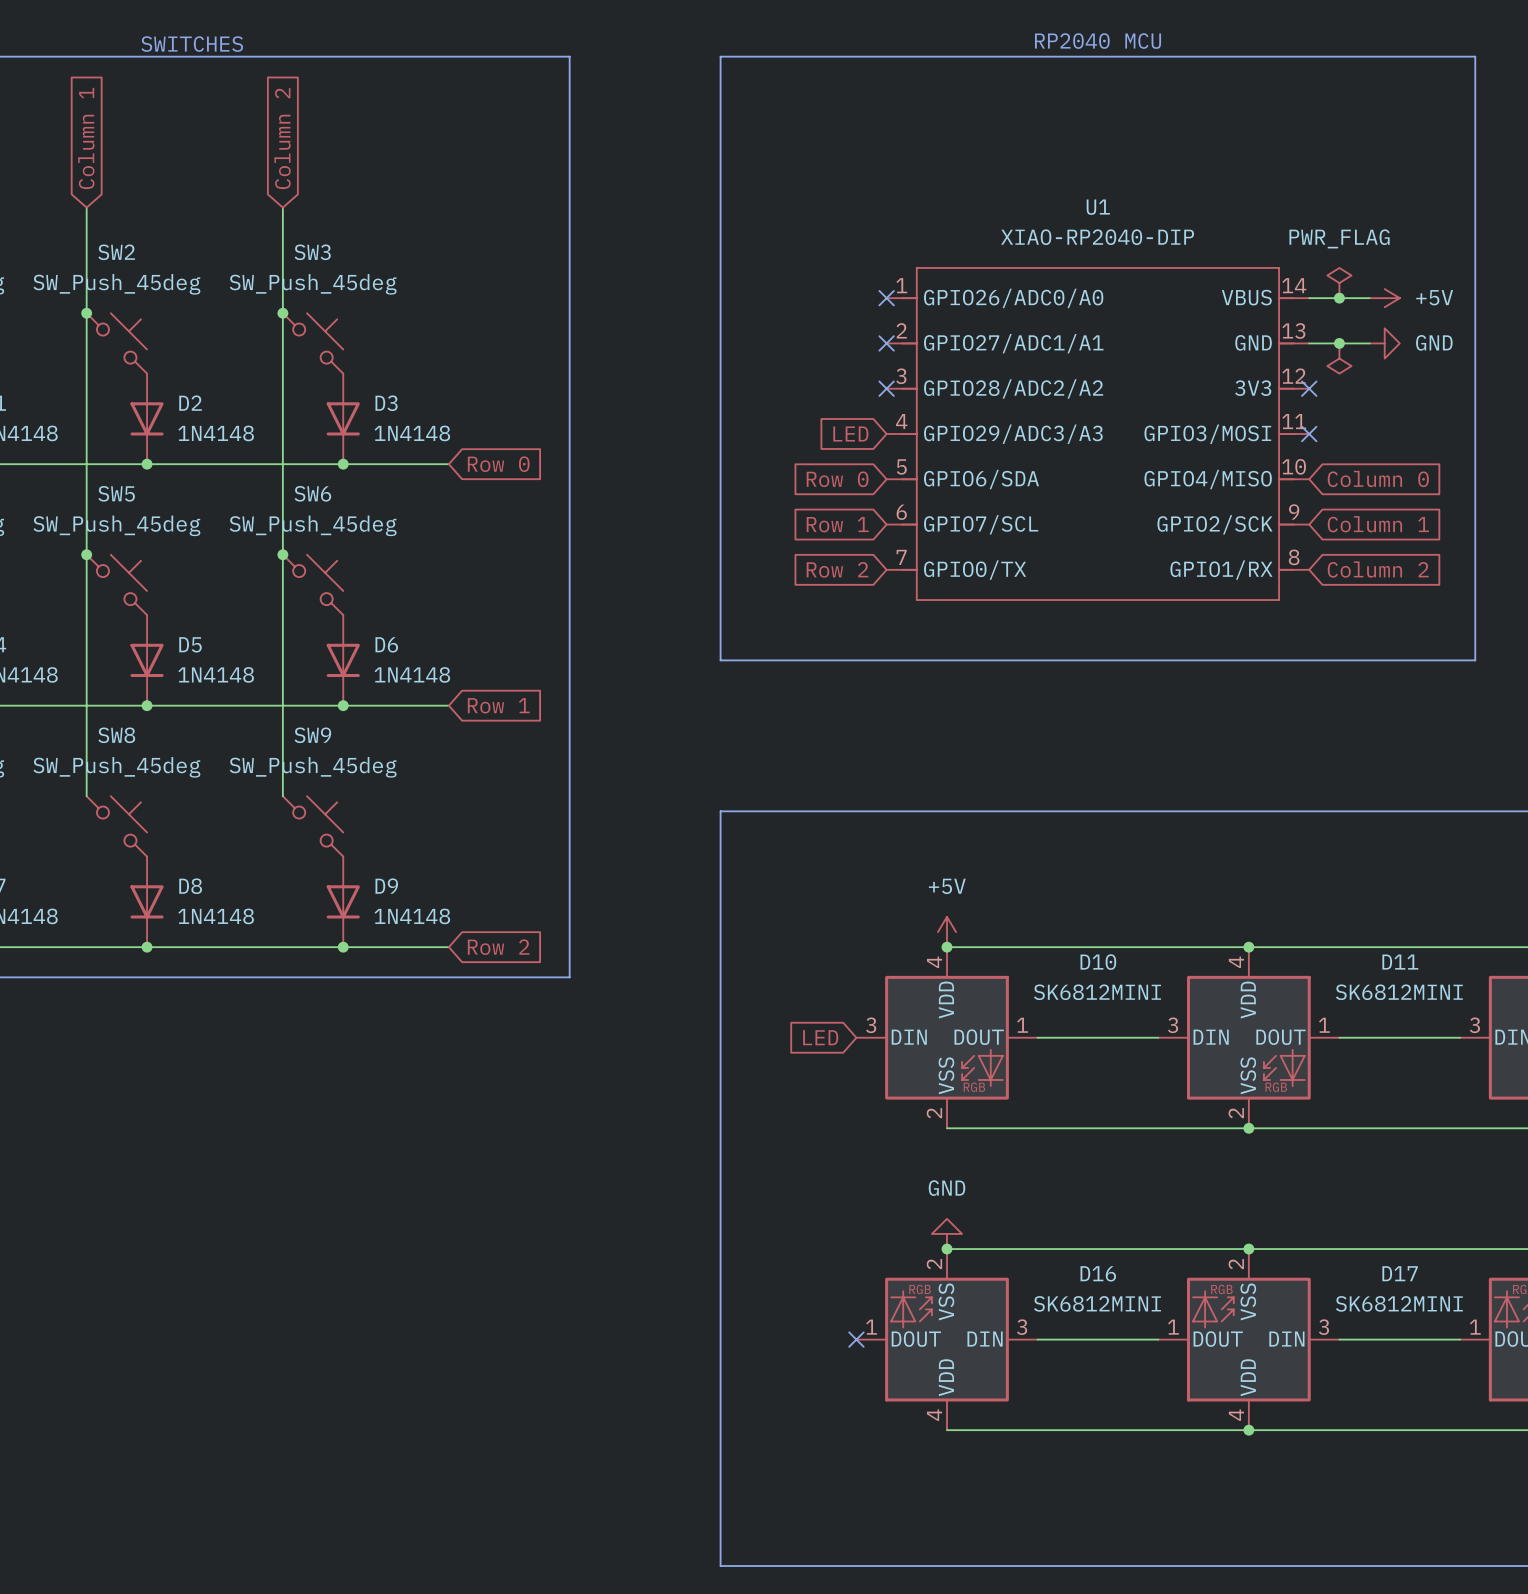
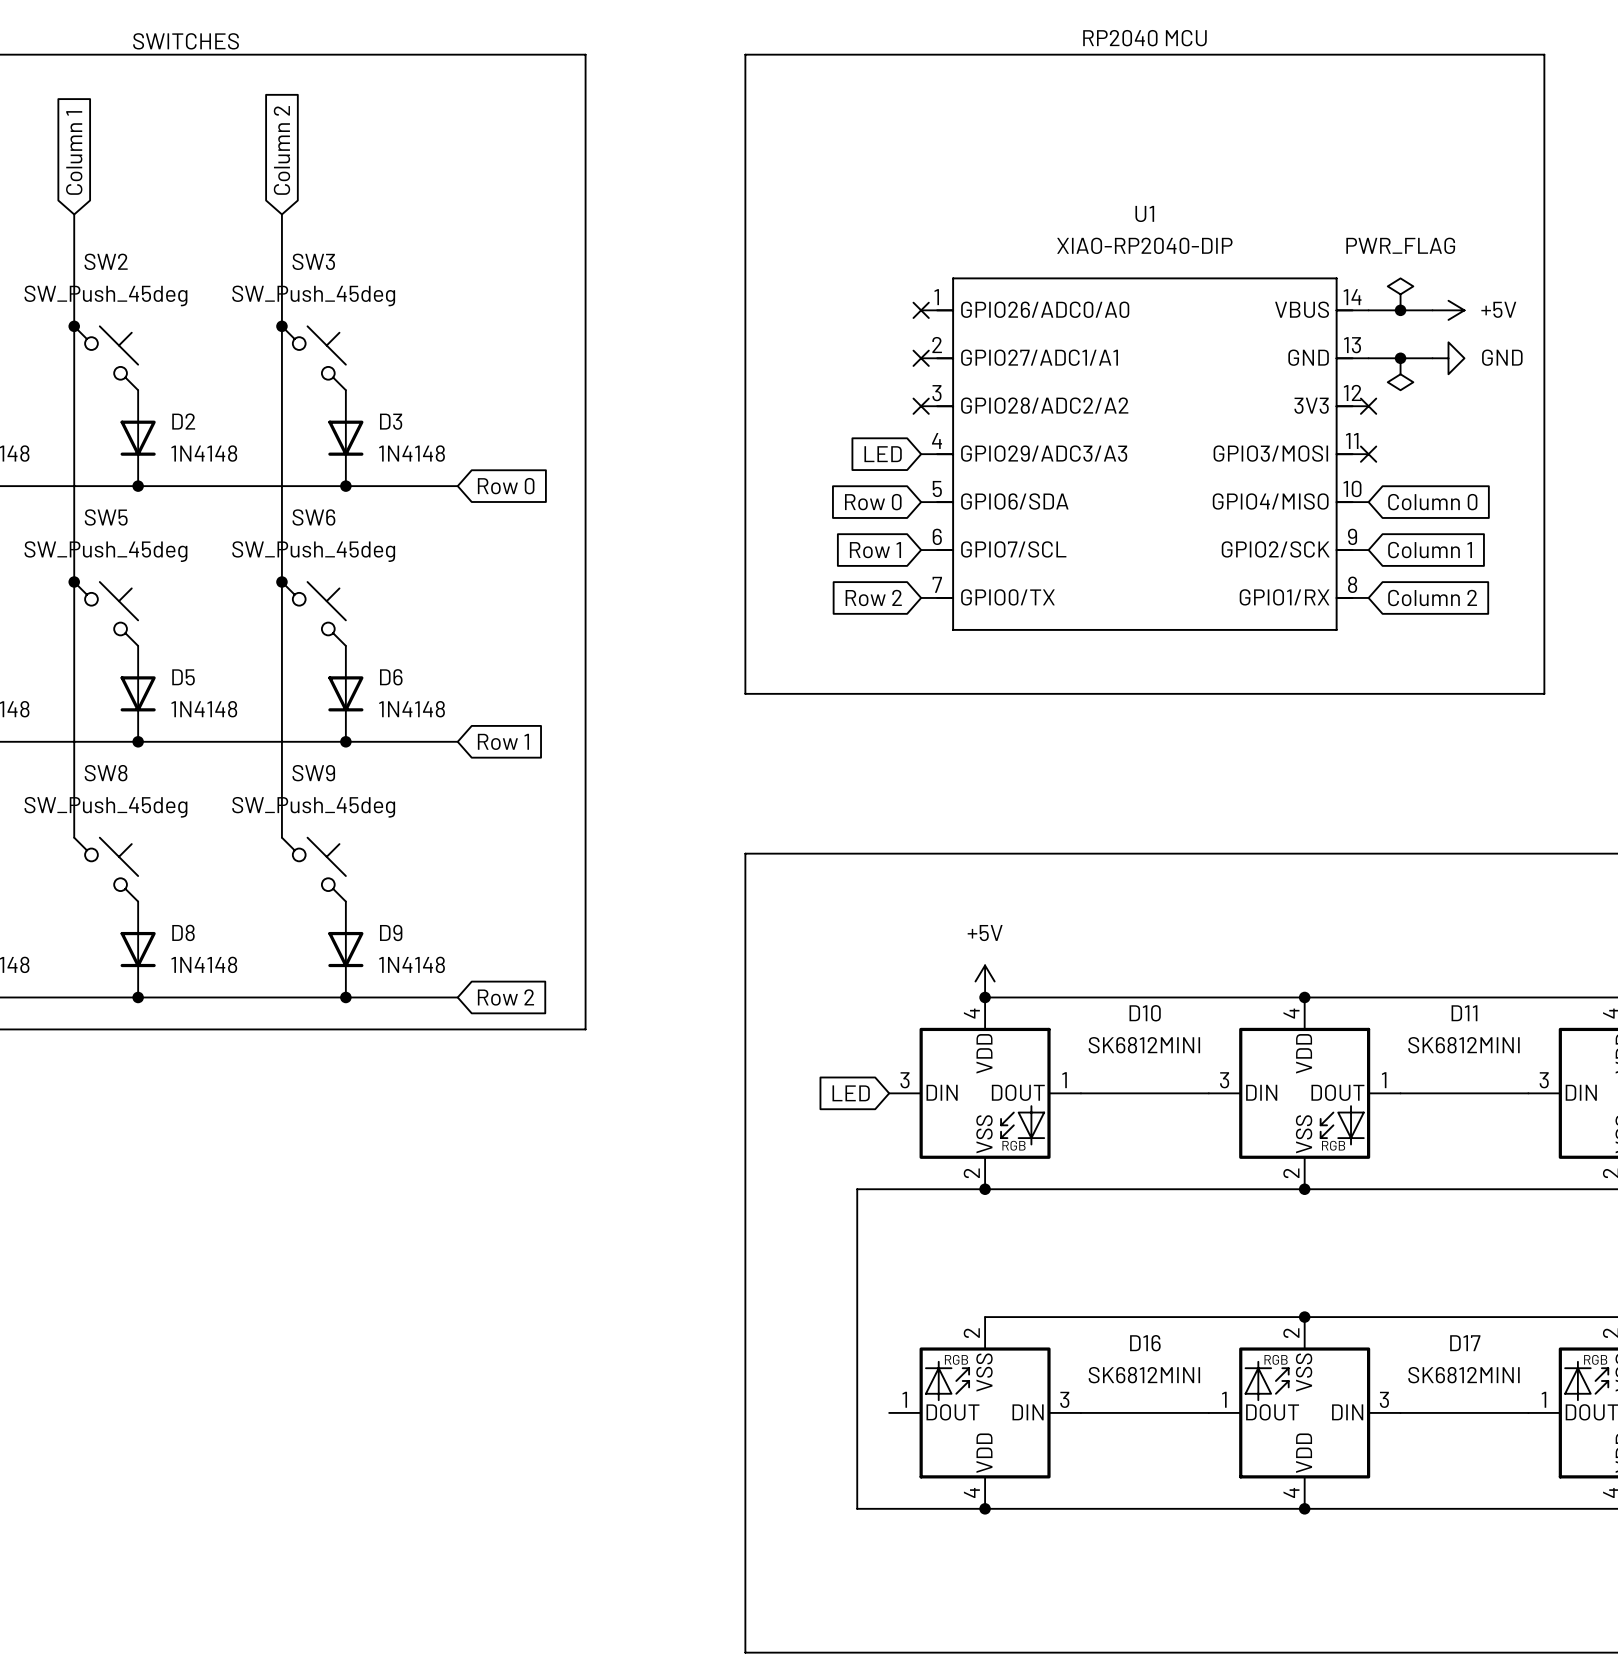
wire: none -> (985, 1189) (857, 1189) (857, 1508) (985, 1508)
junction: none -> (985, 1189)
power symbol: GND (946, 1233) -> none
junction: (946, 1249) -> none
no-connect mark: (856, 1339) -> none
junction: none -> (985, 1508)

